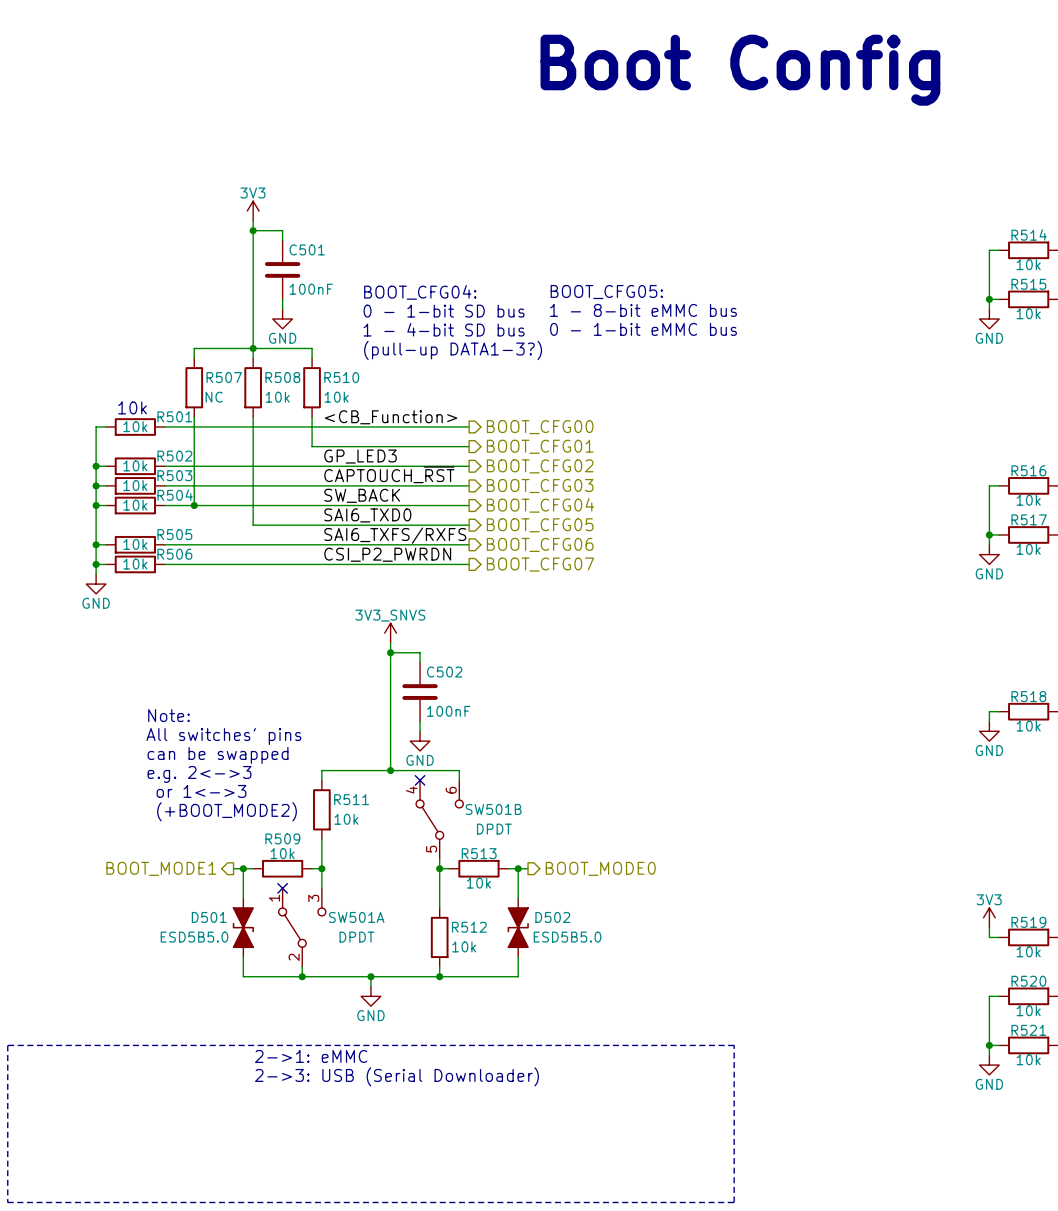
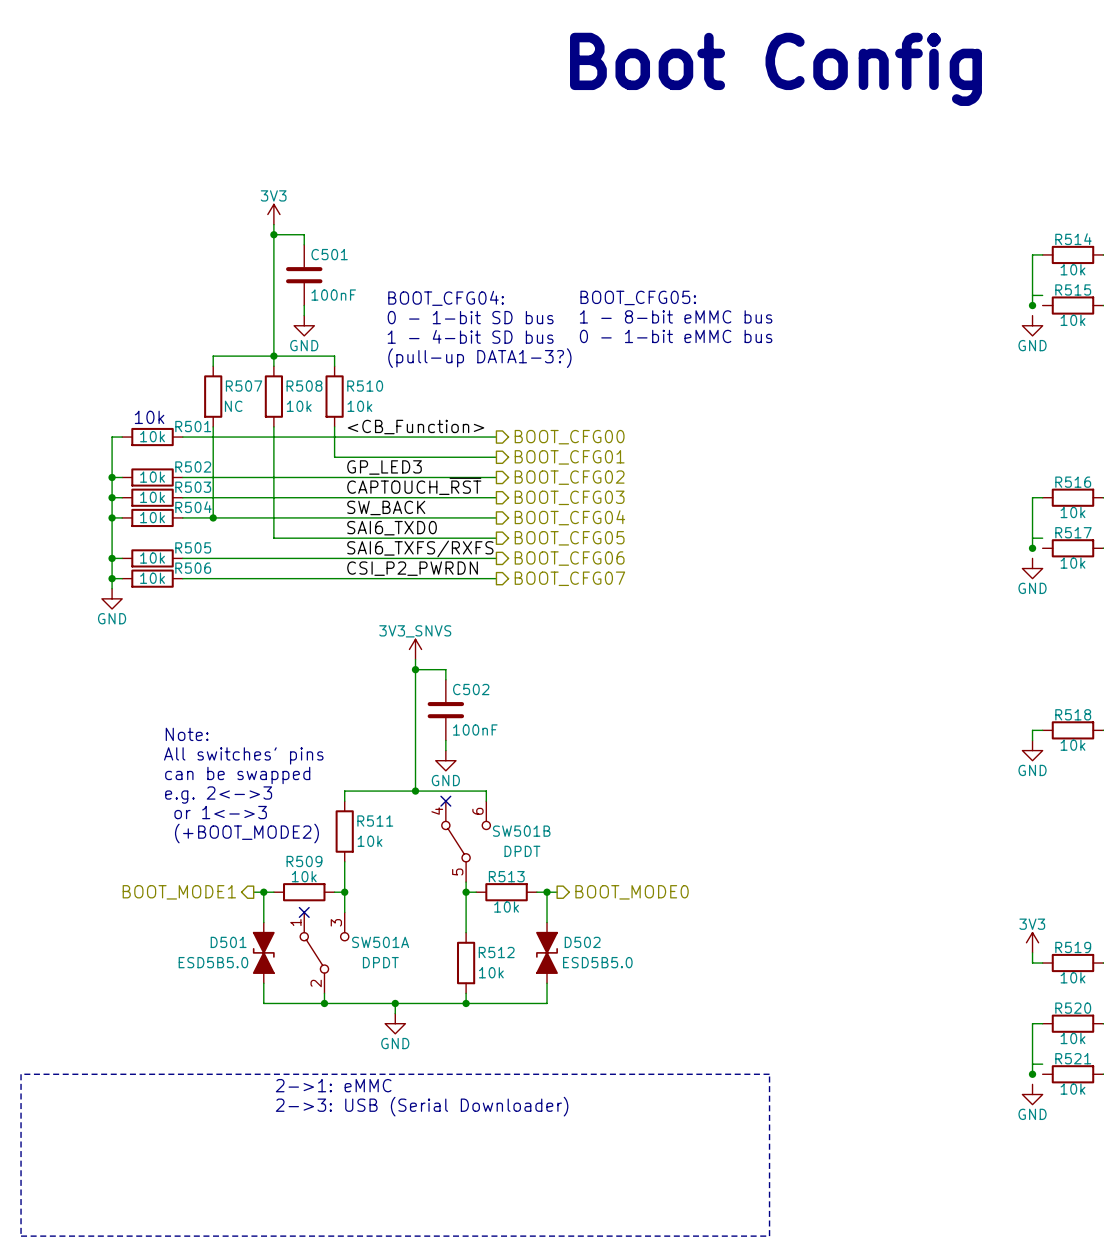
wire: none -> (1032, 295) (1042, 295)
wire: (999, 299) (989, 299) (989, 309) -> none
wire: none -> (1032, 538) (1042, 538)
wire: (999, 534) (989, 534) (989, 544) -> none
wire: none -> (1032, 1064) (1042, 1064)
wire: (999, 1045) (989, 1045) (989, 1055) -> none

